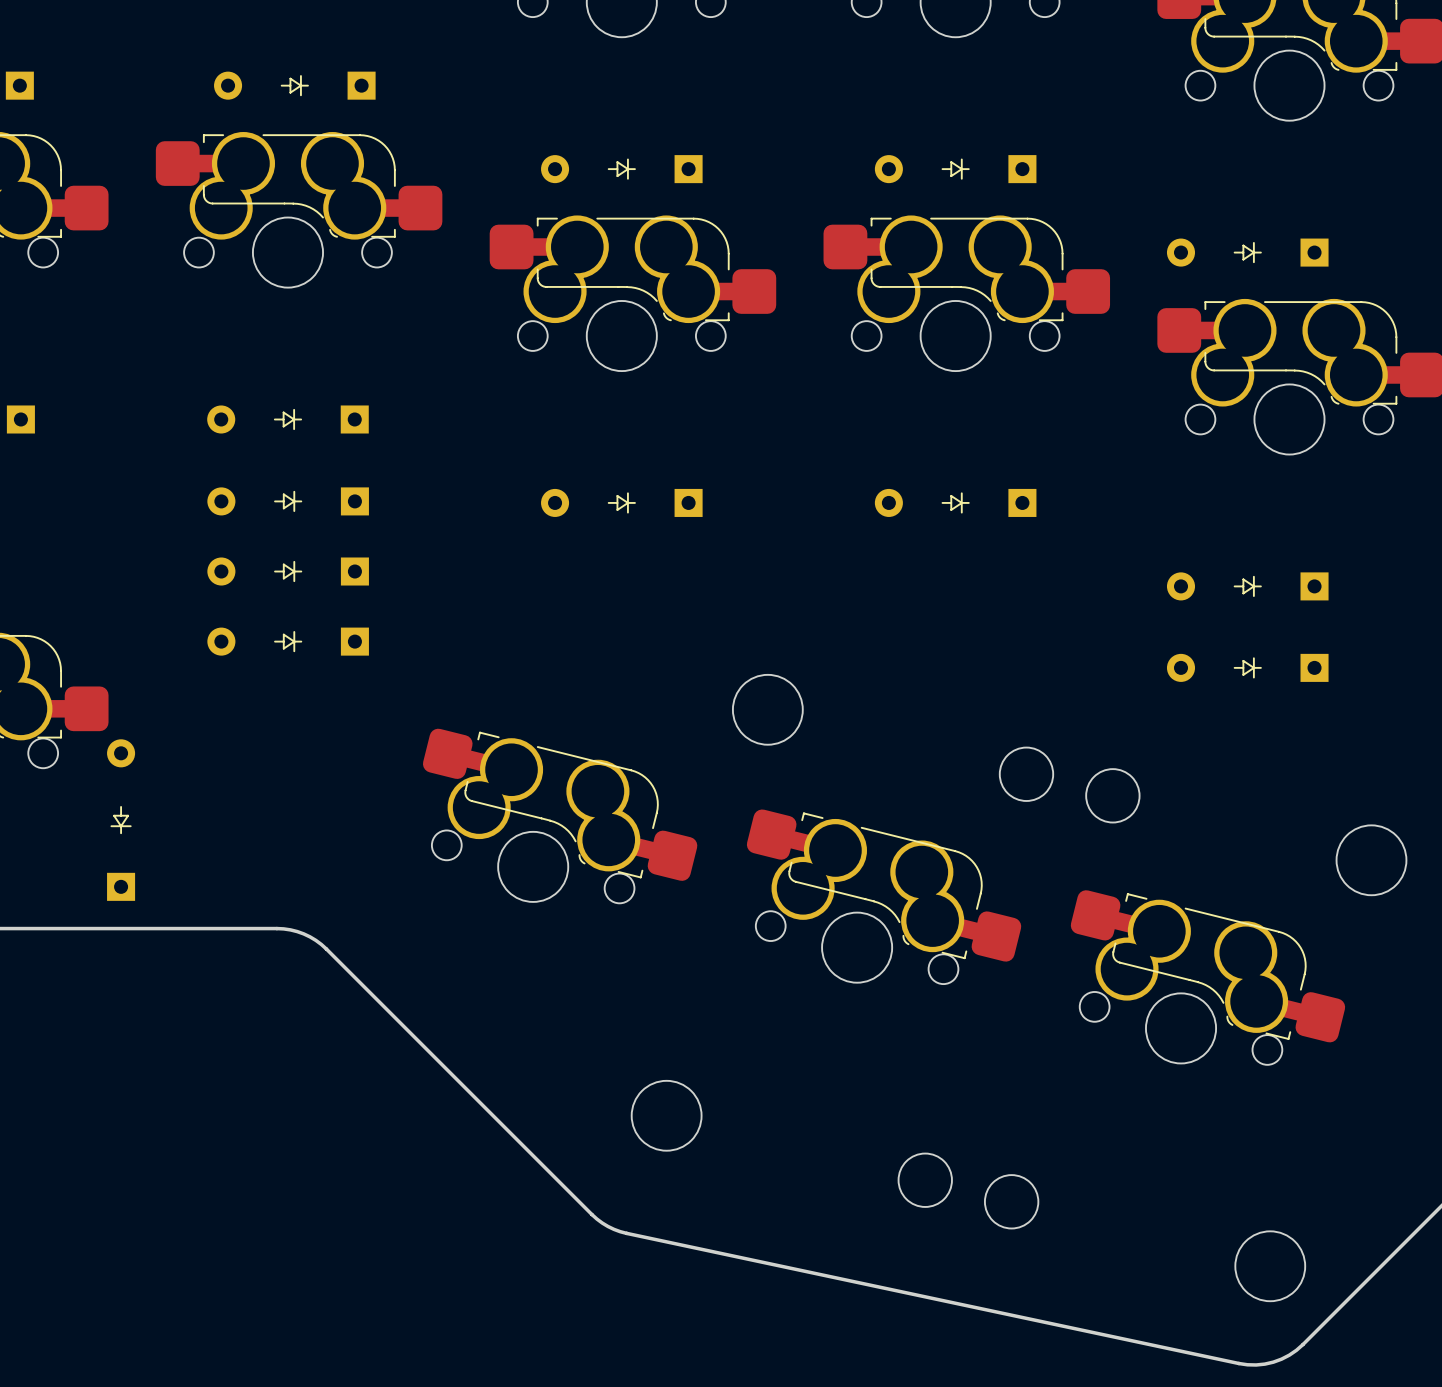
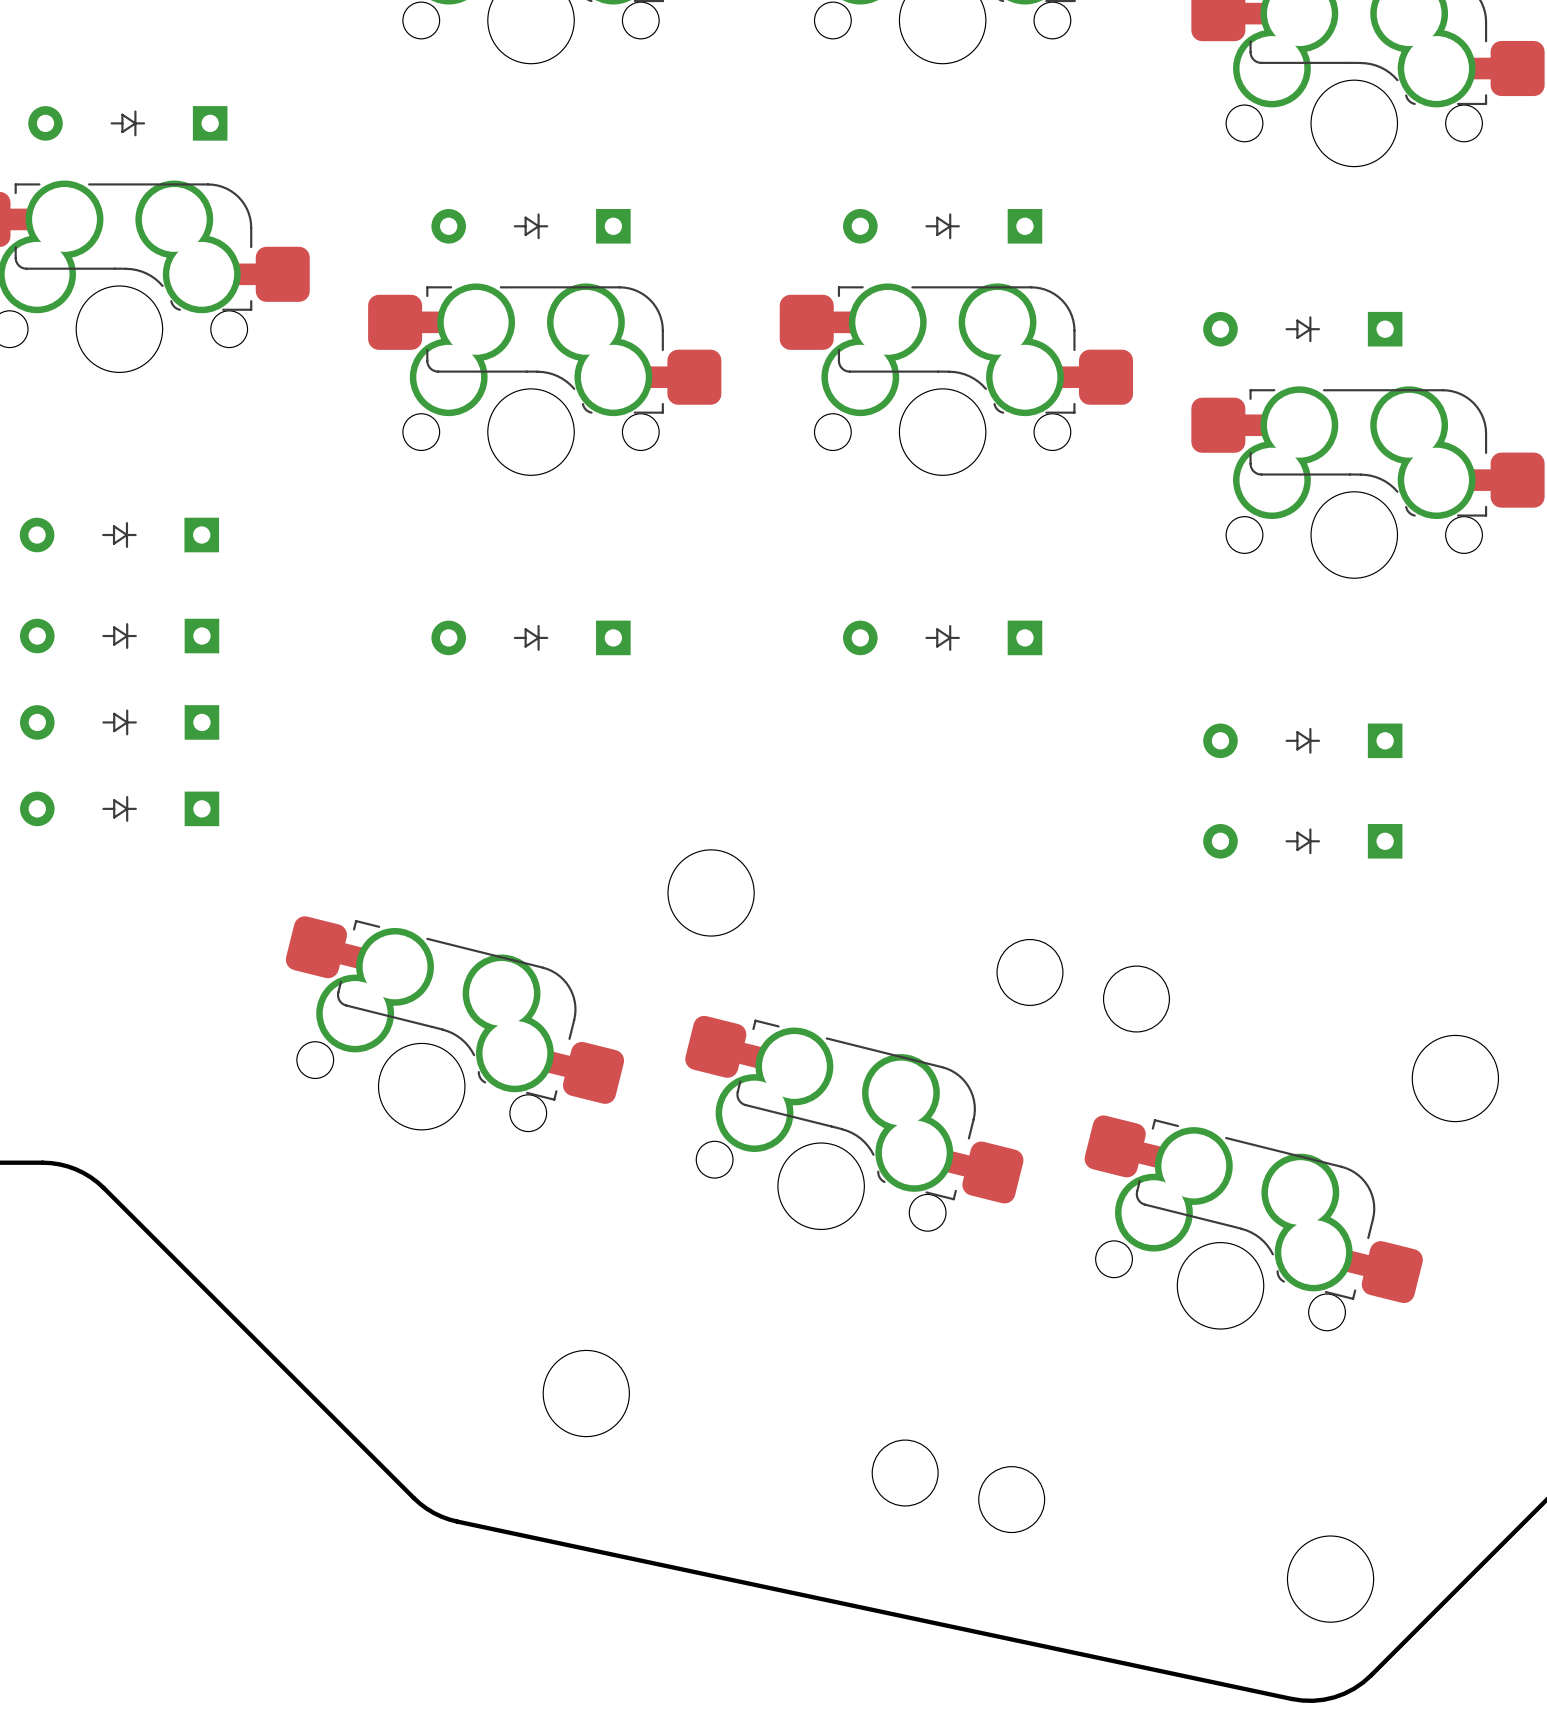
board edge: (225, 928) (290, 929) (309, 936) (321, 944) (591, 1214) (607, 1226) (626, 1233) -> (42, 1162) (67, 1166) (83, 1172) (97, 1182) (420, 1503) (433, 1512) (449, 1519) (537, 1538)

